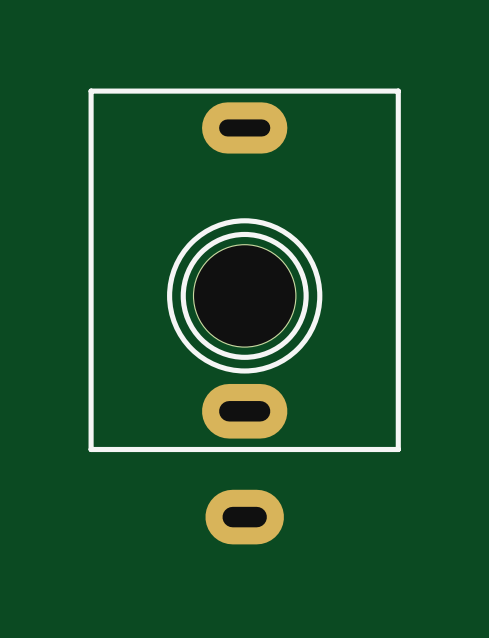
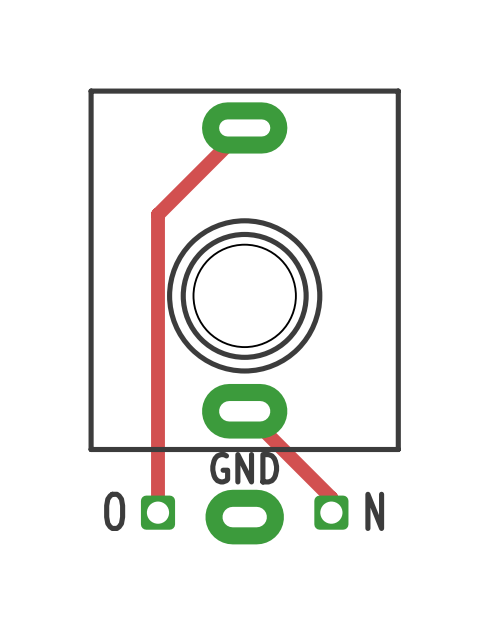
track: none -> (244, 127) (157, 214) (157, 512)
track: none -> (244, 411) (331, 497) (331, 512)
text: none -> GND (244, 468)
text: none -> O (114, 511)
text: none -> N (374, 511)
part: none -> (157, 512)
part: none -> (331, 512)

